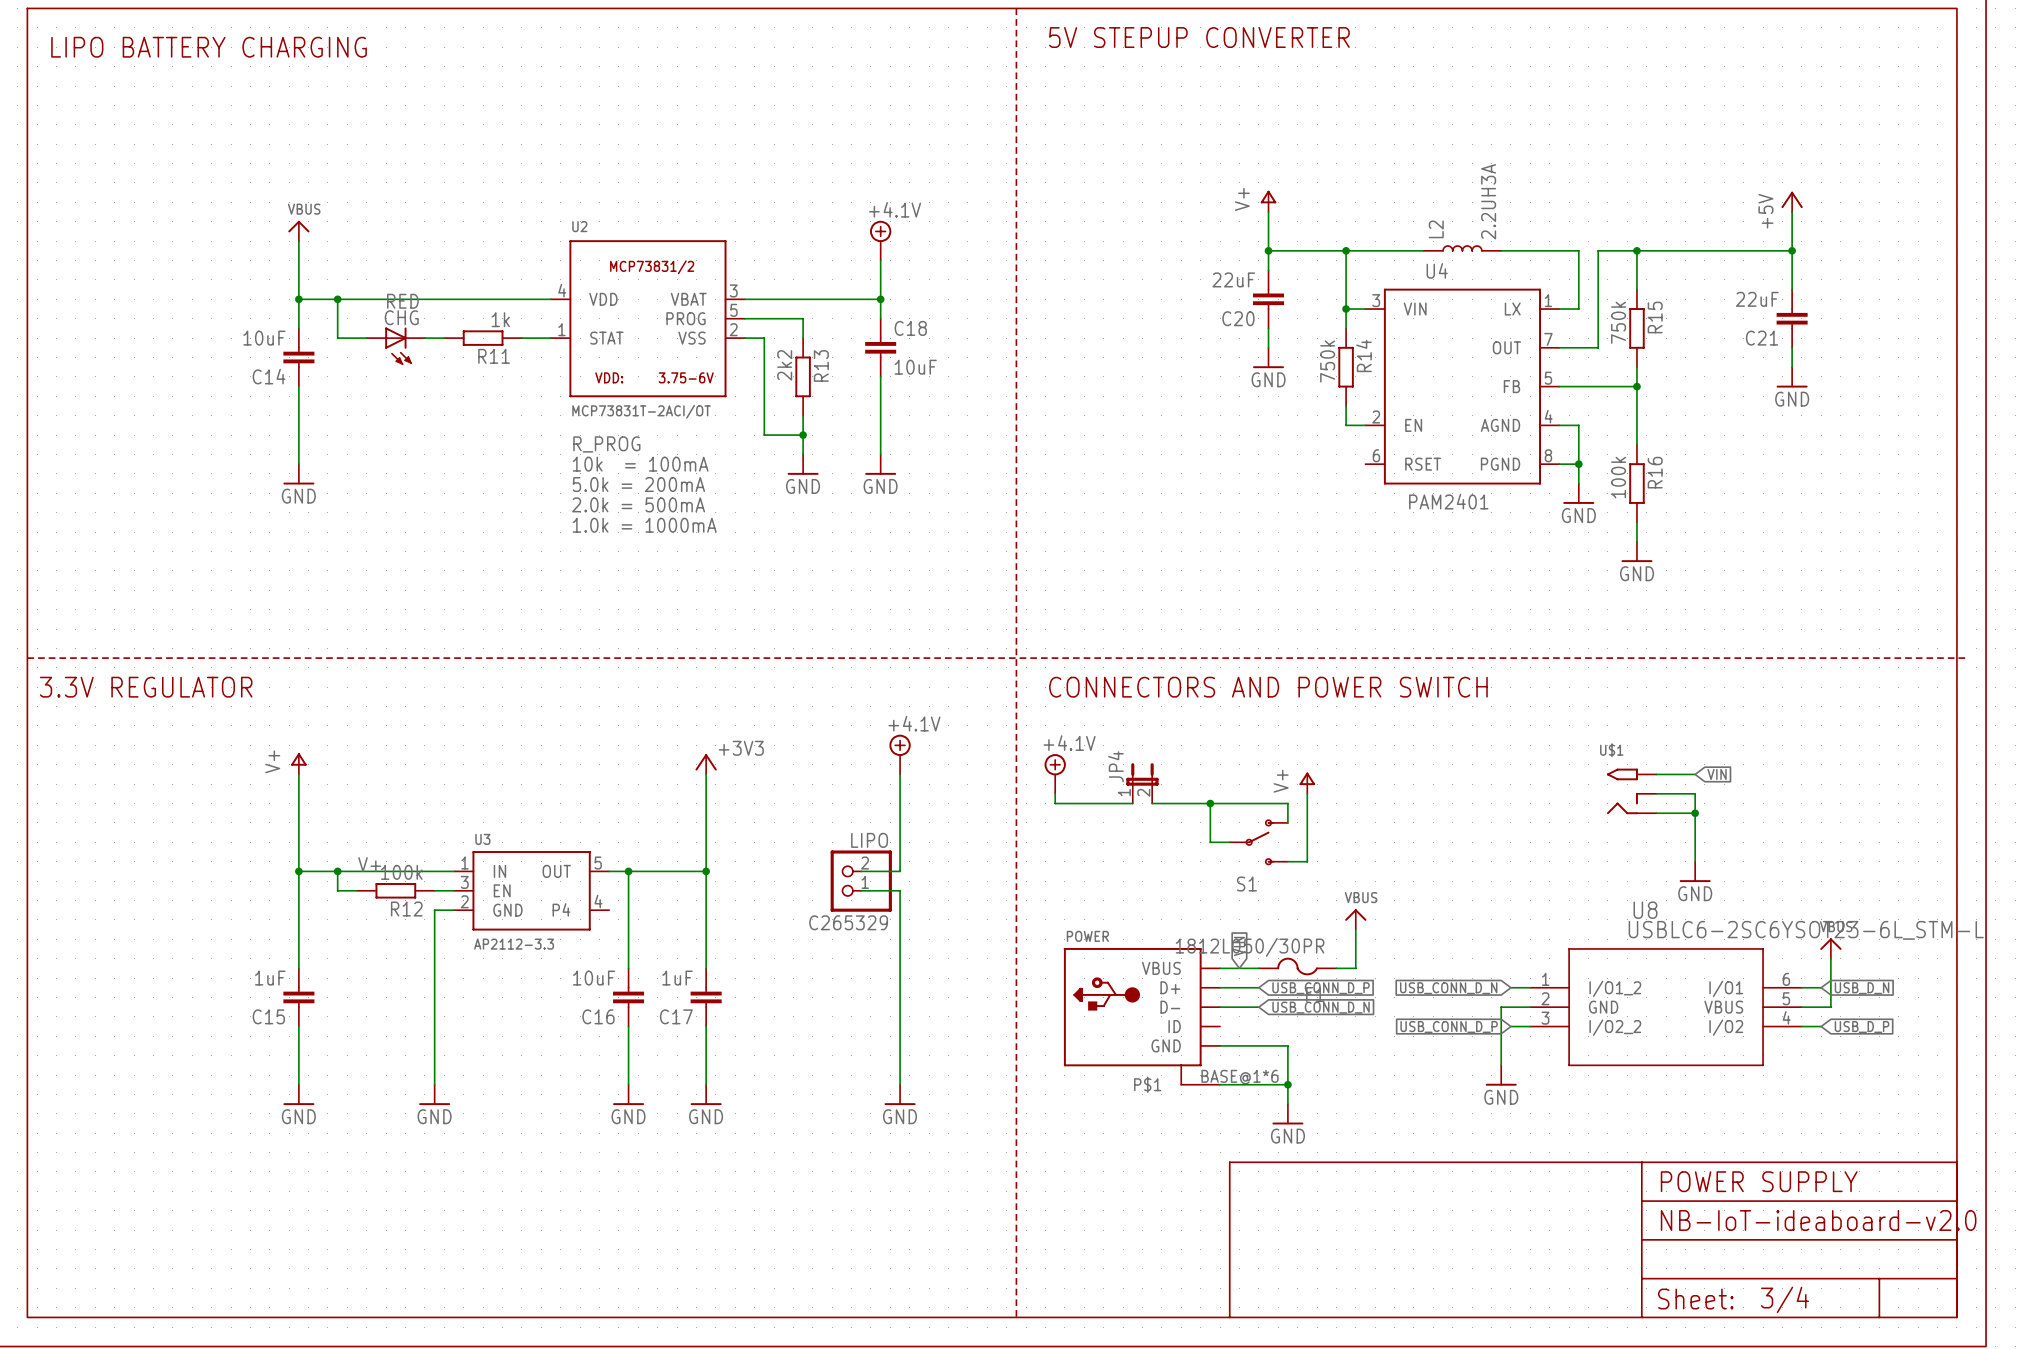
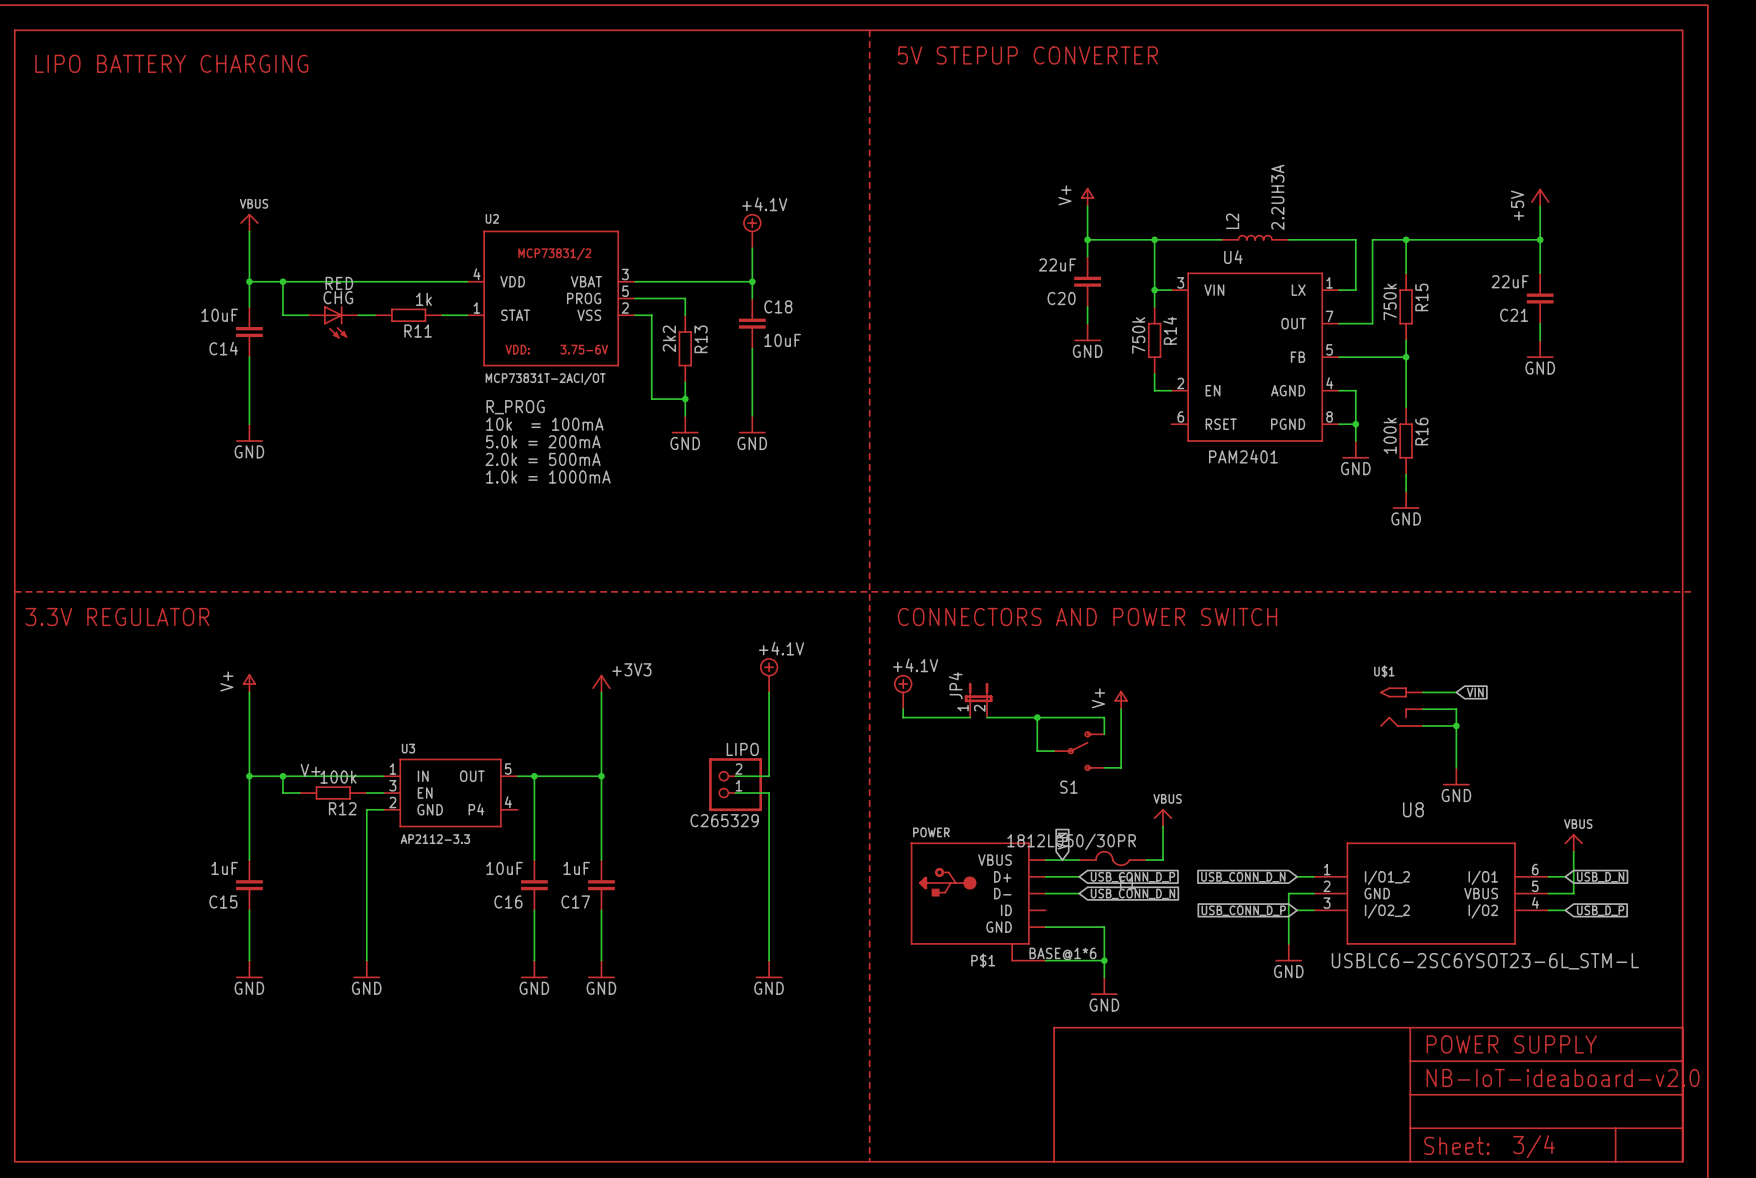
U8 value position: USBLC6-2SC6YSOT23-6L_STM-L (1806, 930) -> USBLC6-2SC6YSOT23-6L_STM-L (1485, 961)

